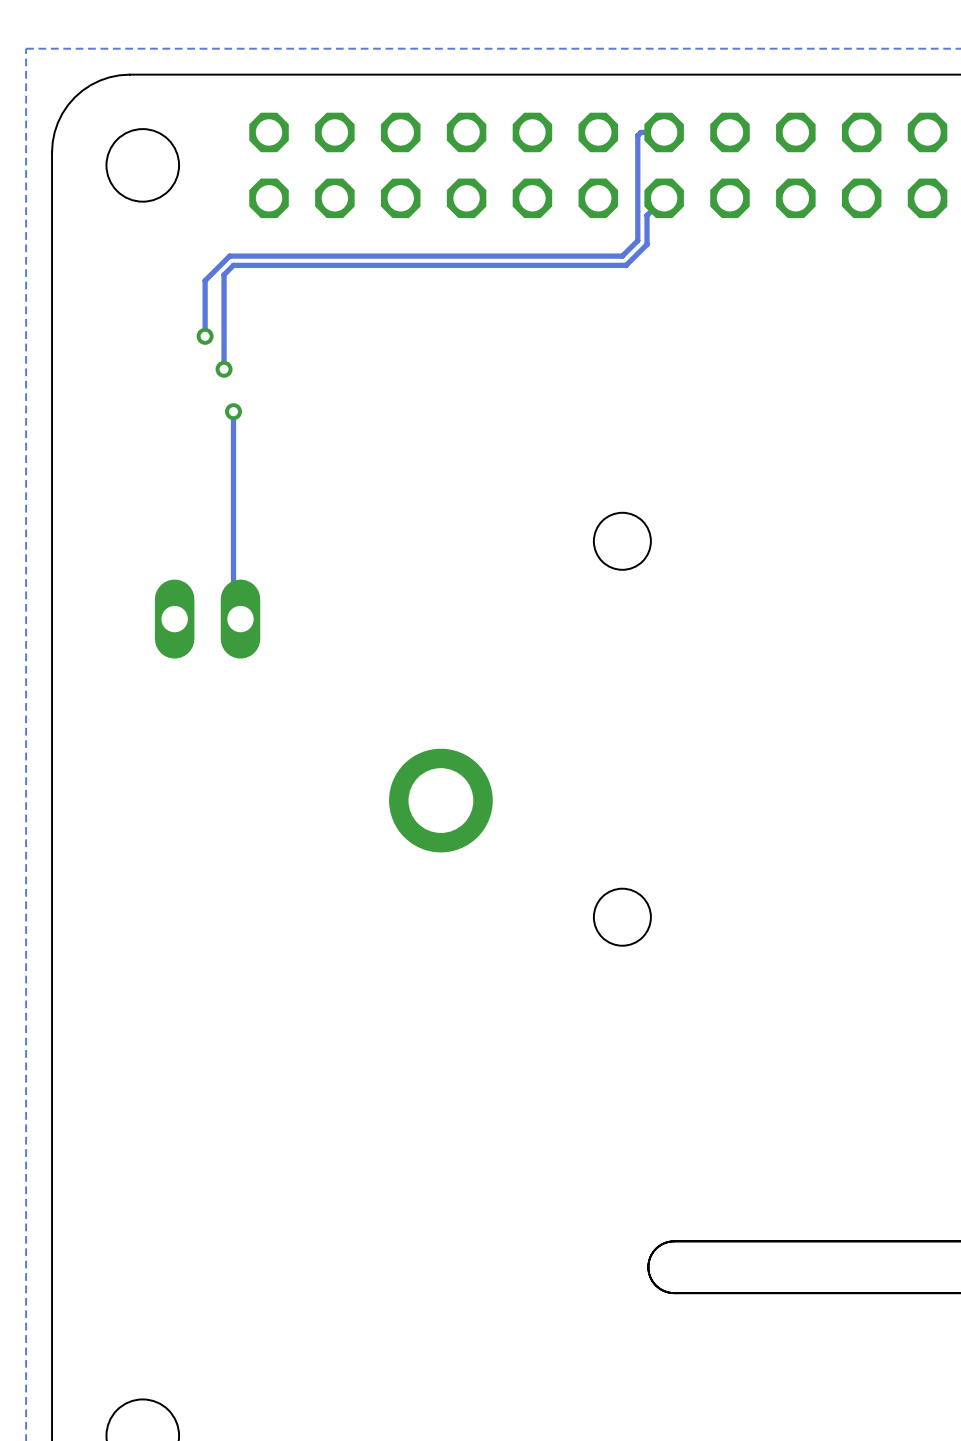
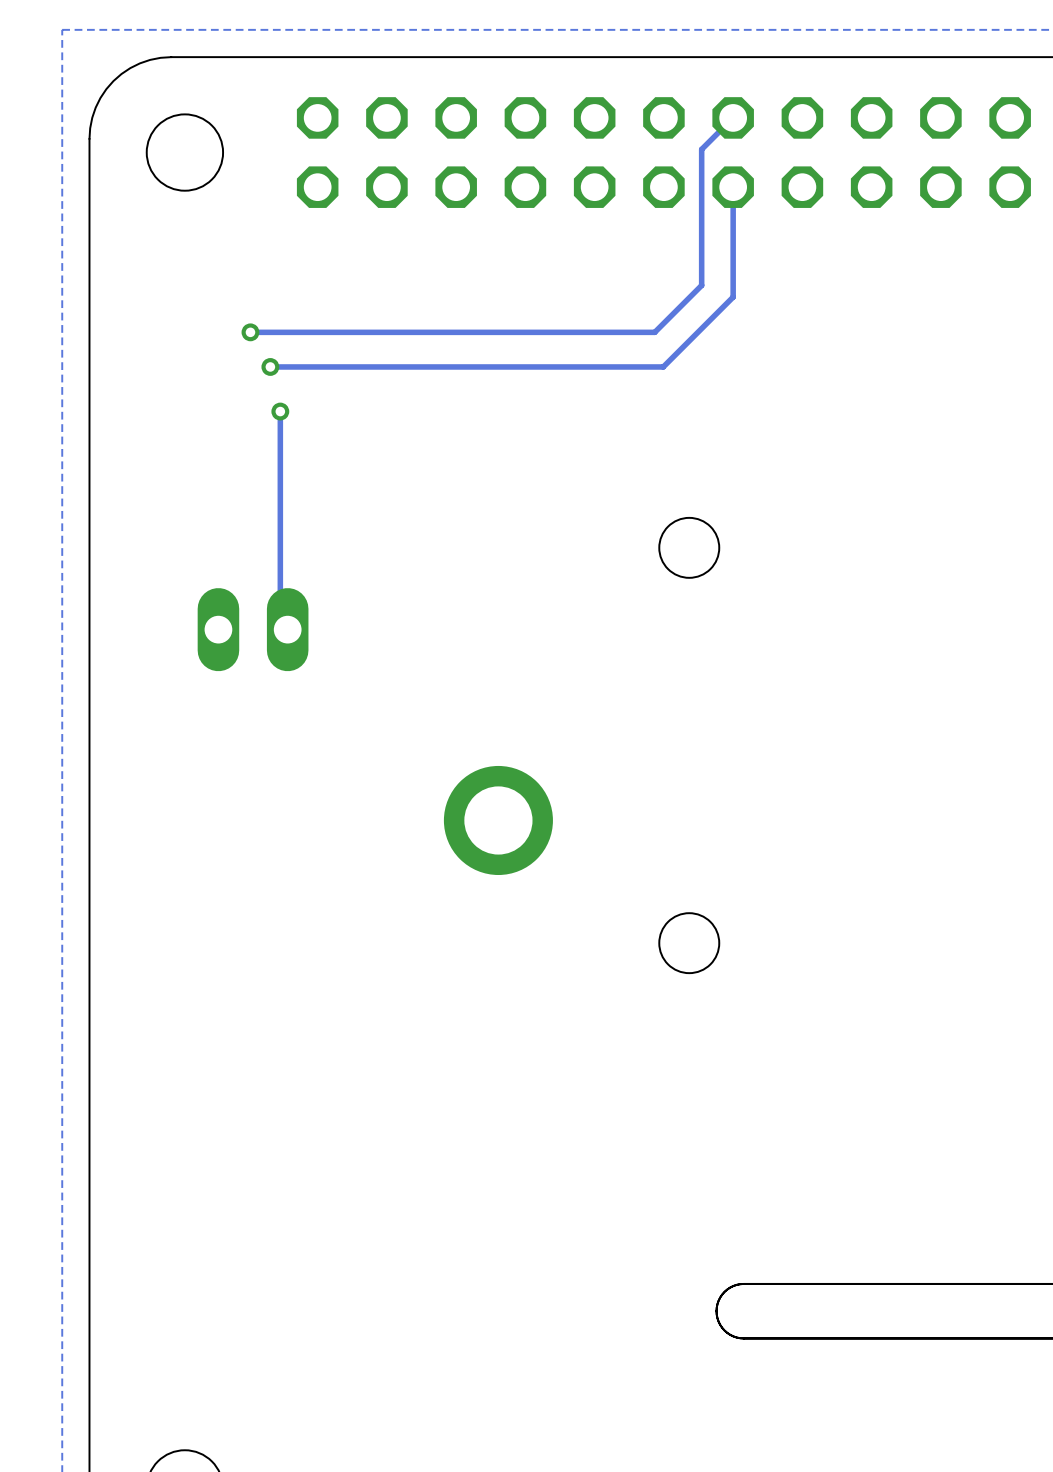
track: (664, 132) (640, 132) (637, 135) (637, 240) (622, 256) (229, 256) (205, 280) (205, 336) -> (733, 117) (701, 149) (701, 285) (654, 332) (250, 332)
track: (664, 198) (647, 215) (647, 244) (626, 265) (233, 265) (224, 274) (224, 369) -> (733, 187) (733, 297) (663, 366) (270, 366)

